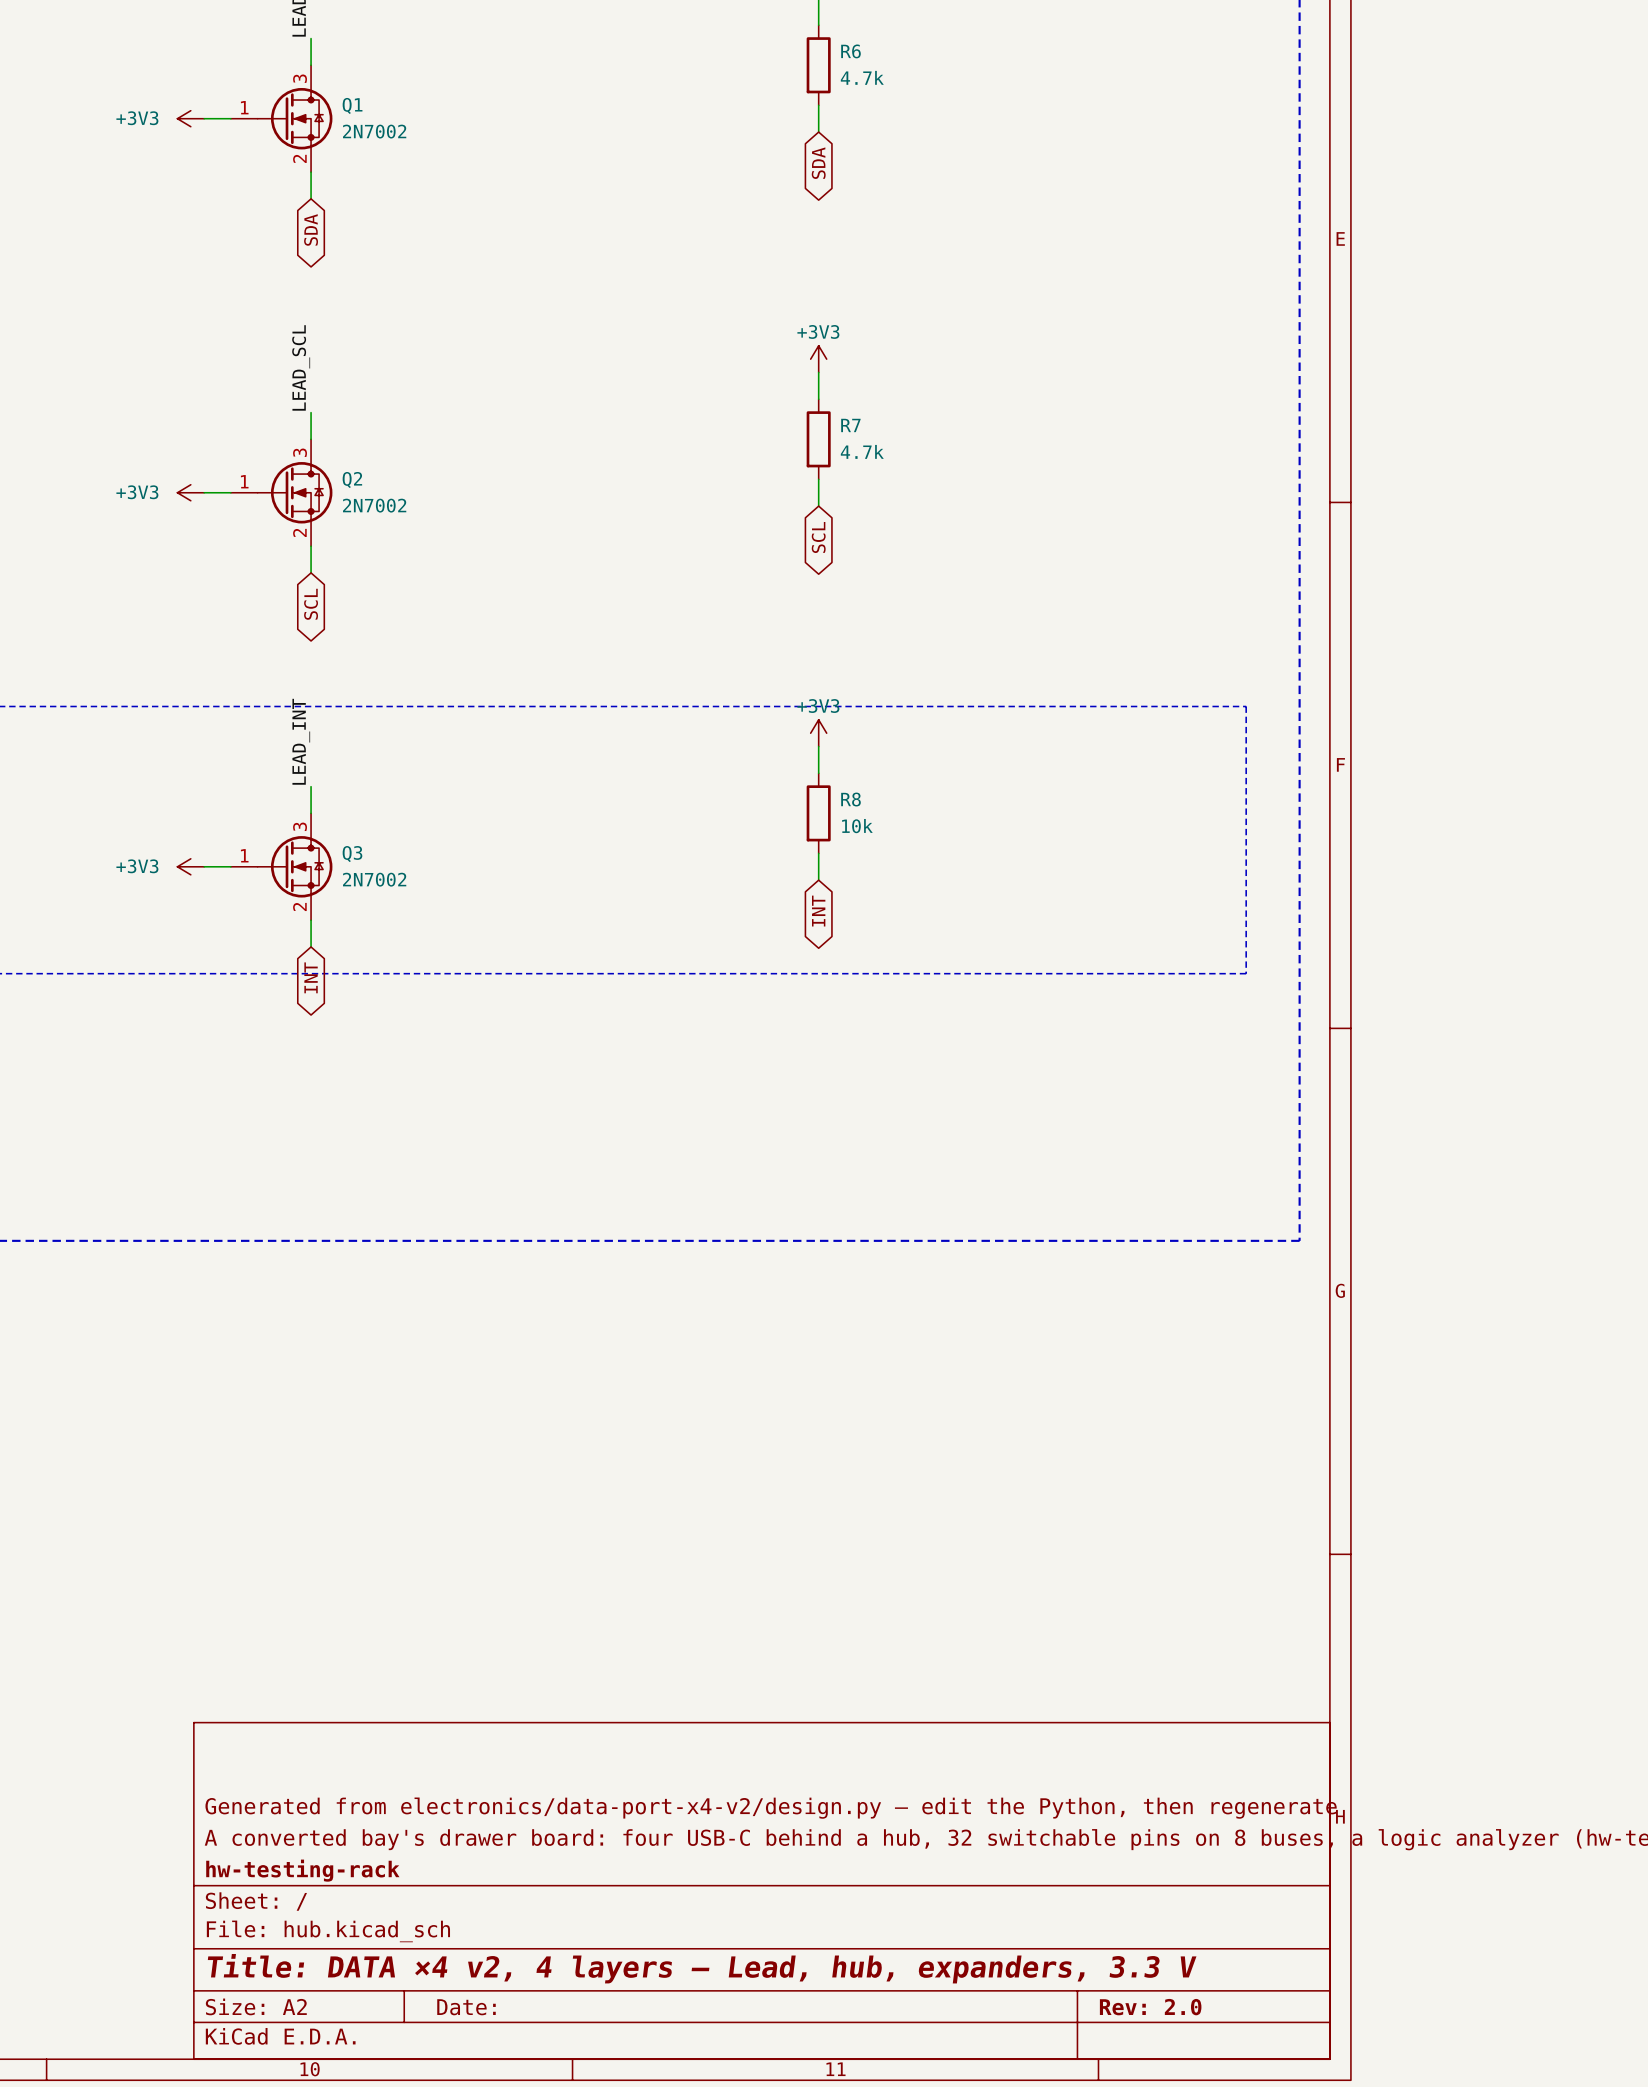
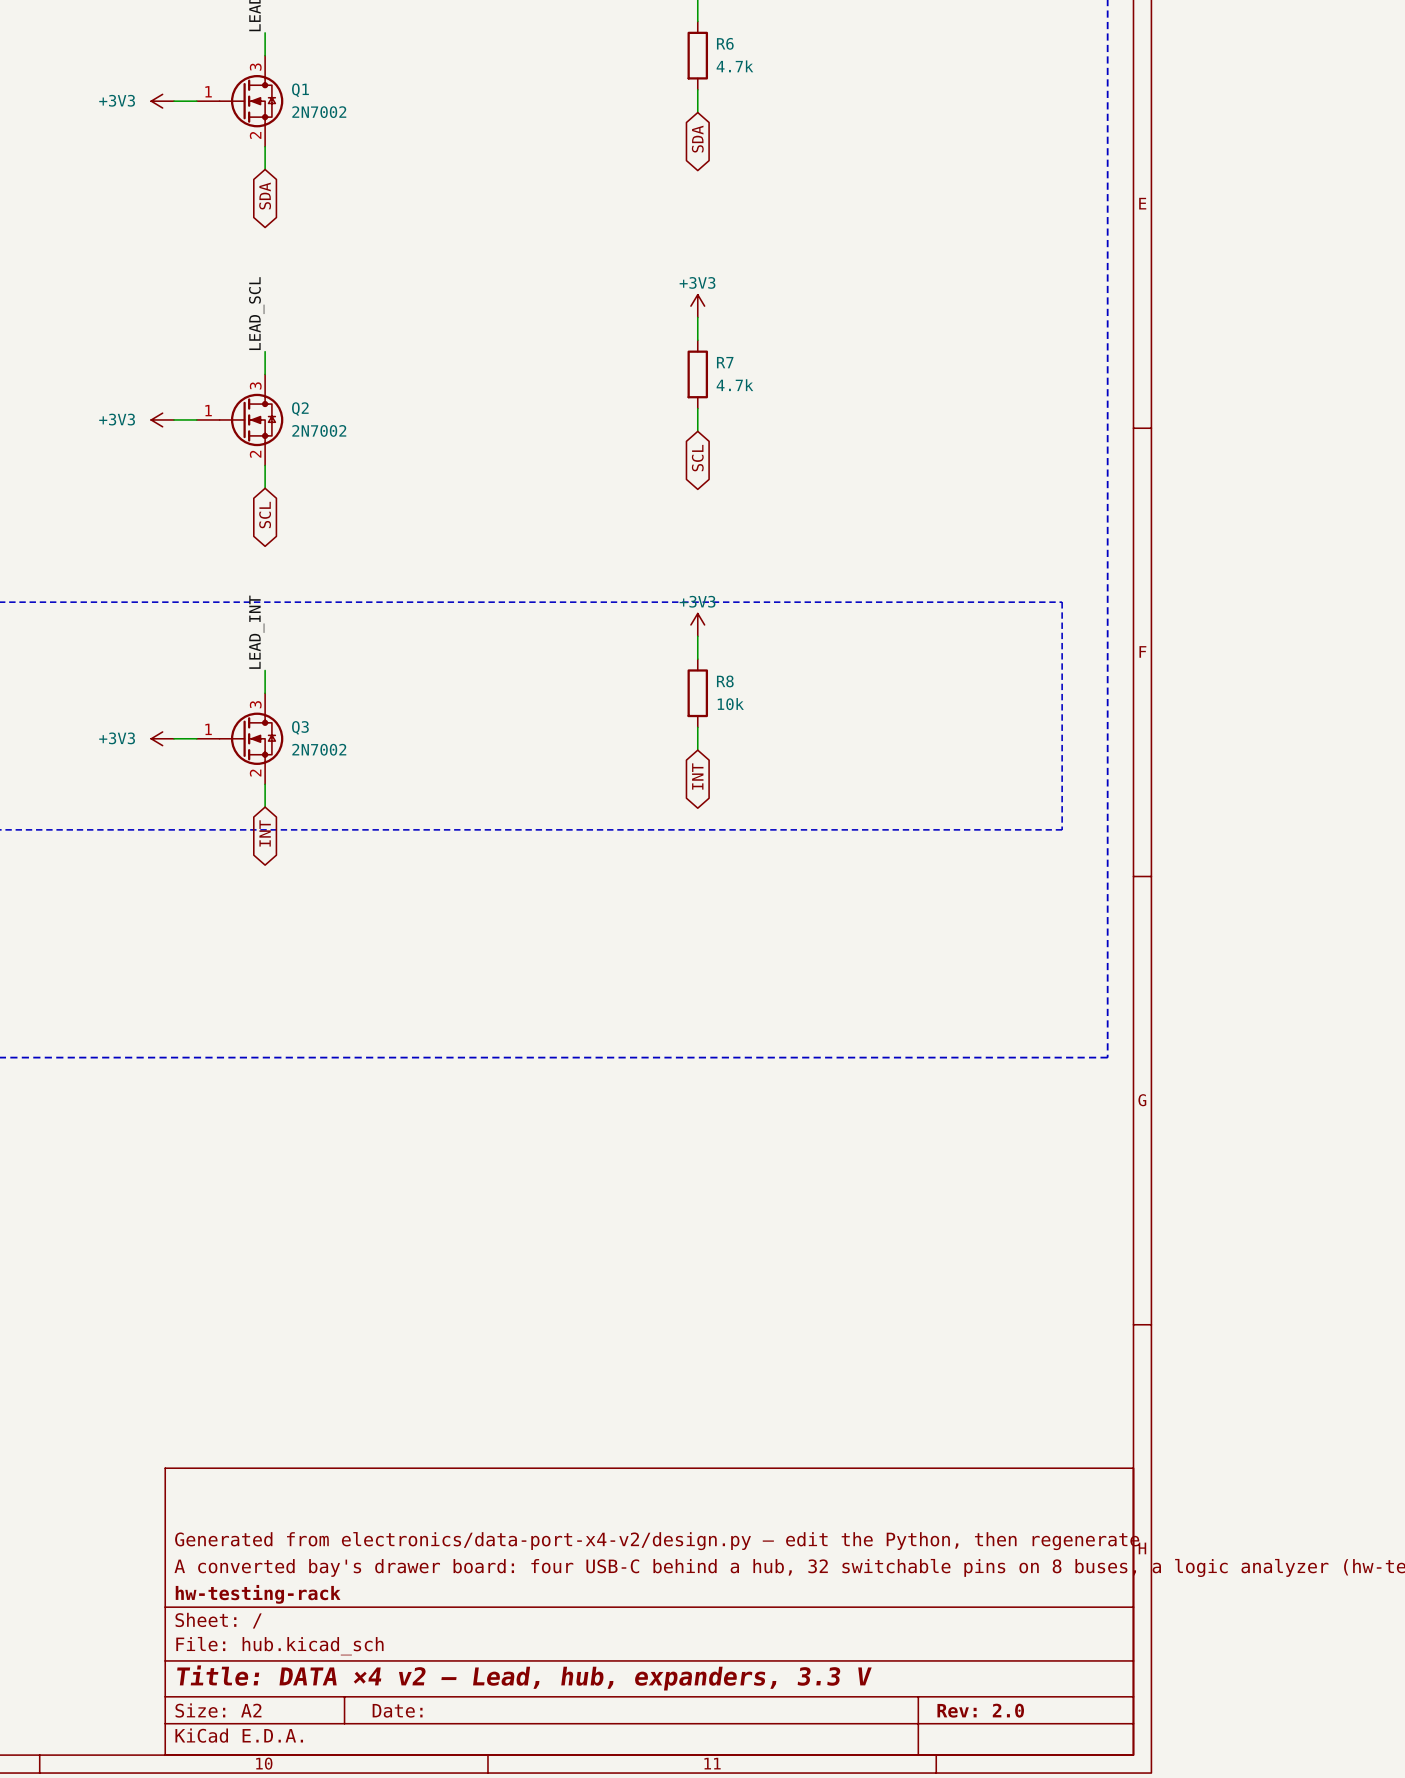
title block: Title: DATA ×4 v2, 4 layers — Lead, hub, expanders, 3.3 V (702, 1968) -> Title: DATA ×4 v2 — Lead, hub, expanders, 3.3 V (524, 1677)

